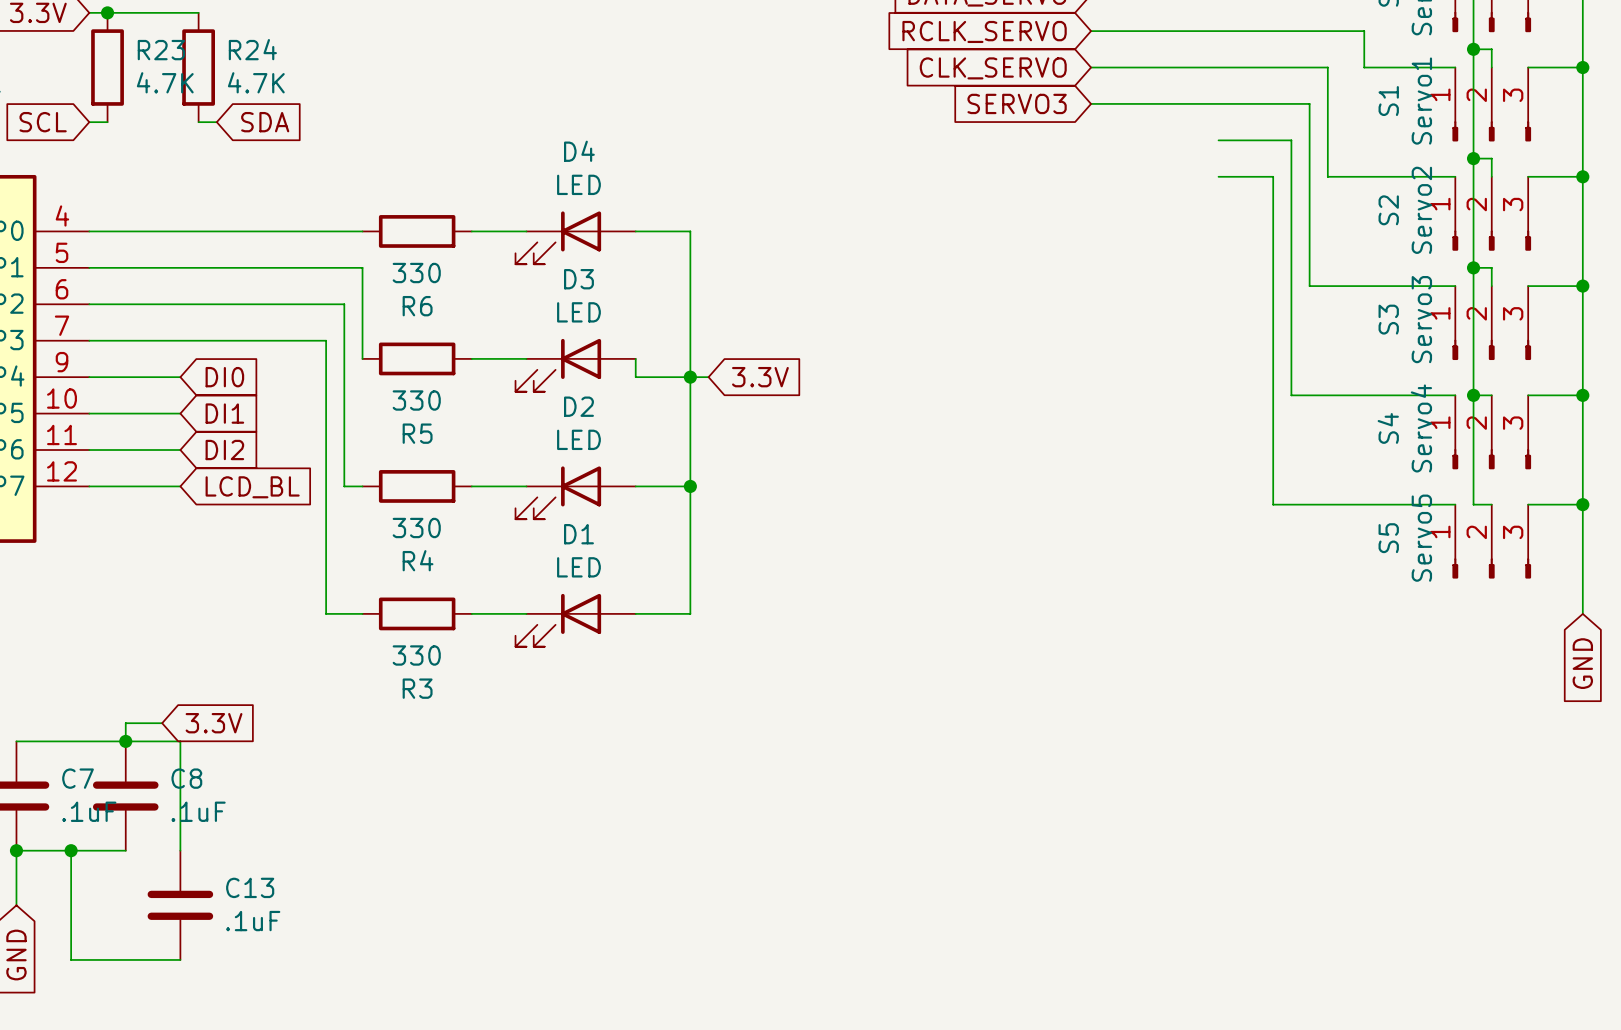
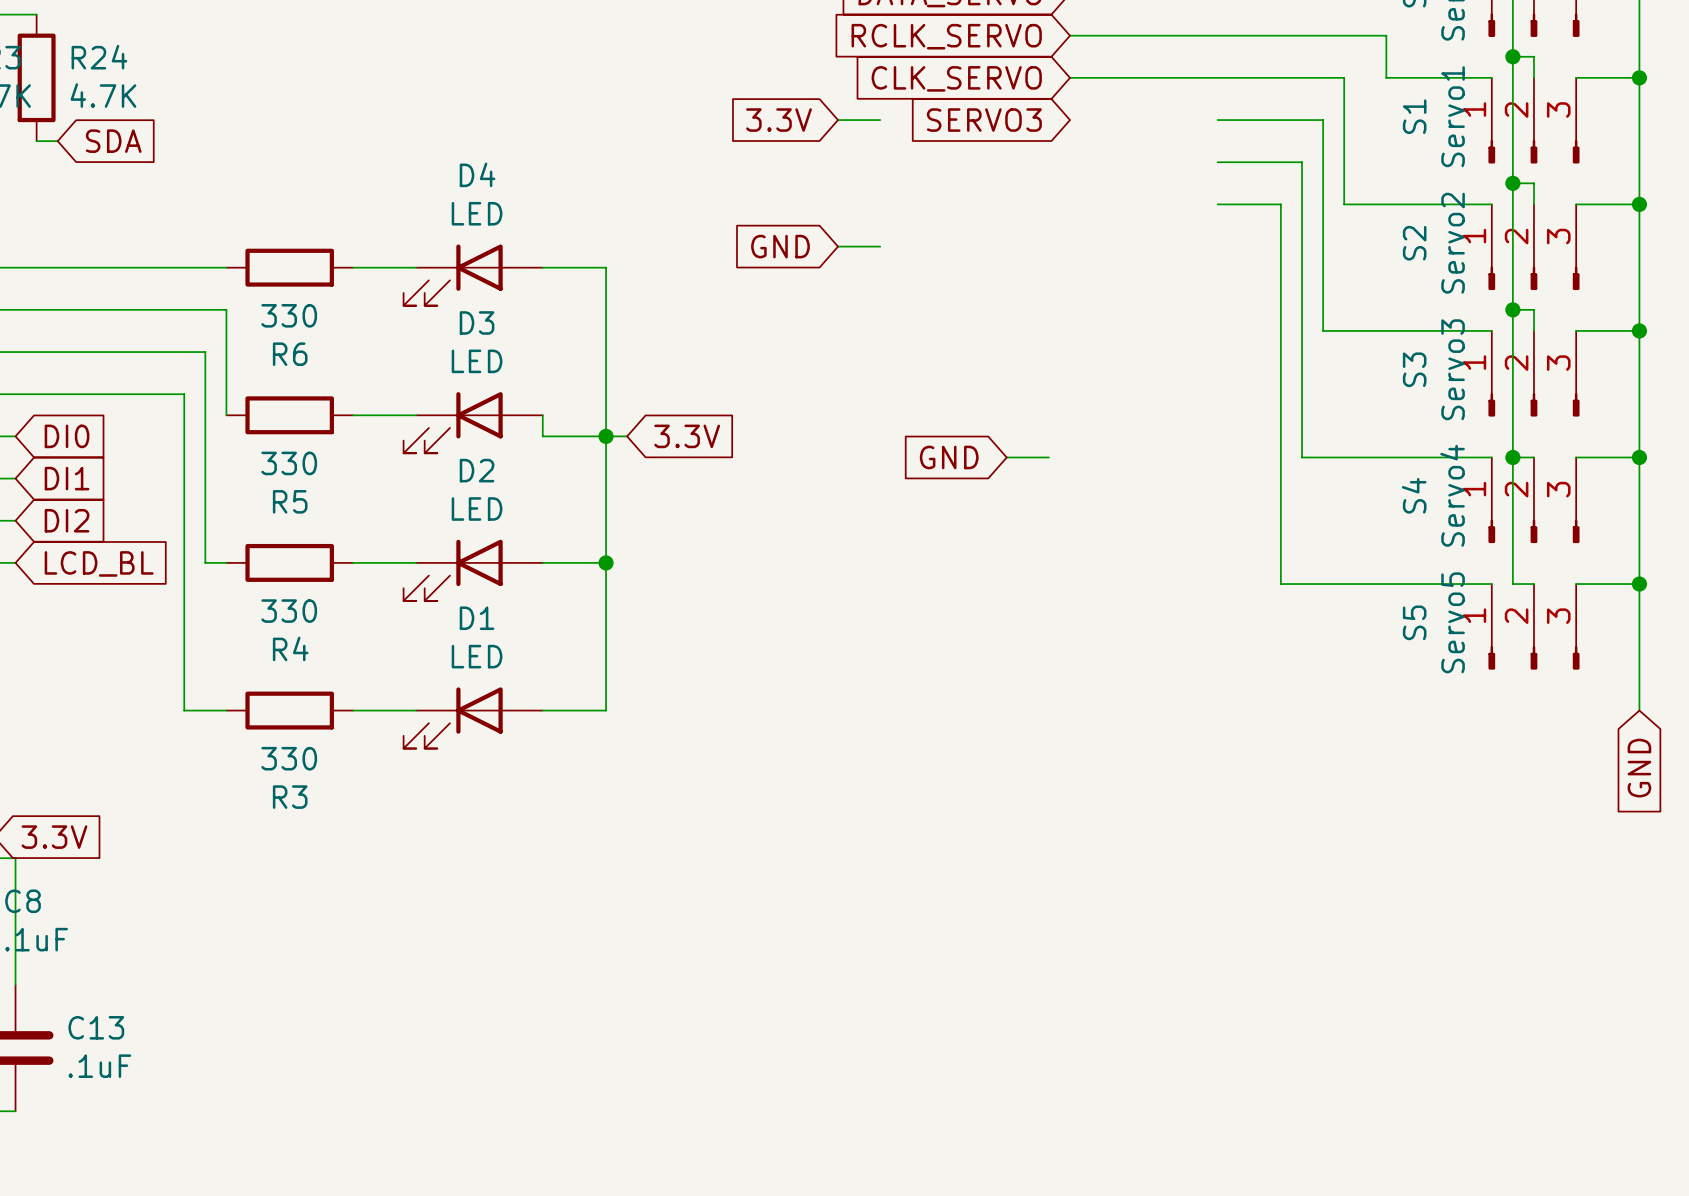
global label: none -> 3.3V (778, 120)
wire: none -> (838, 120) (880, 120)
wire: (1091, 103) (1218, 103) -> none
global label: none -> GND (780, 246)
wire: none -> (838, 246) (880, 246)
global label: none -> GND (949, 457)
wire: none -> (1006, 457) (1048, 457)

